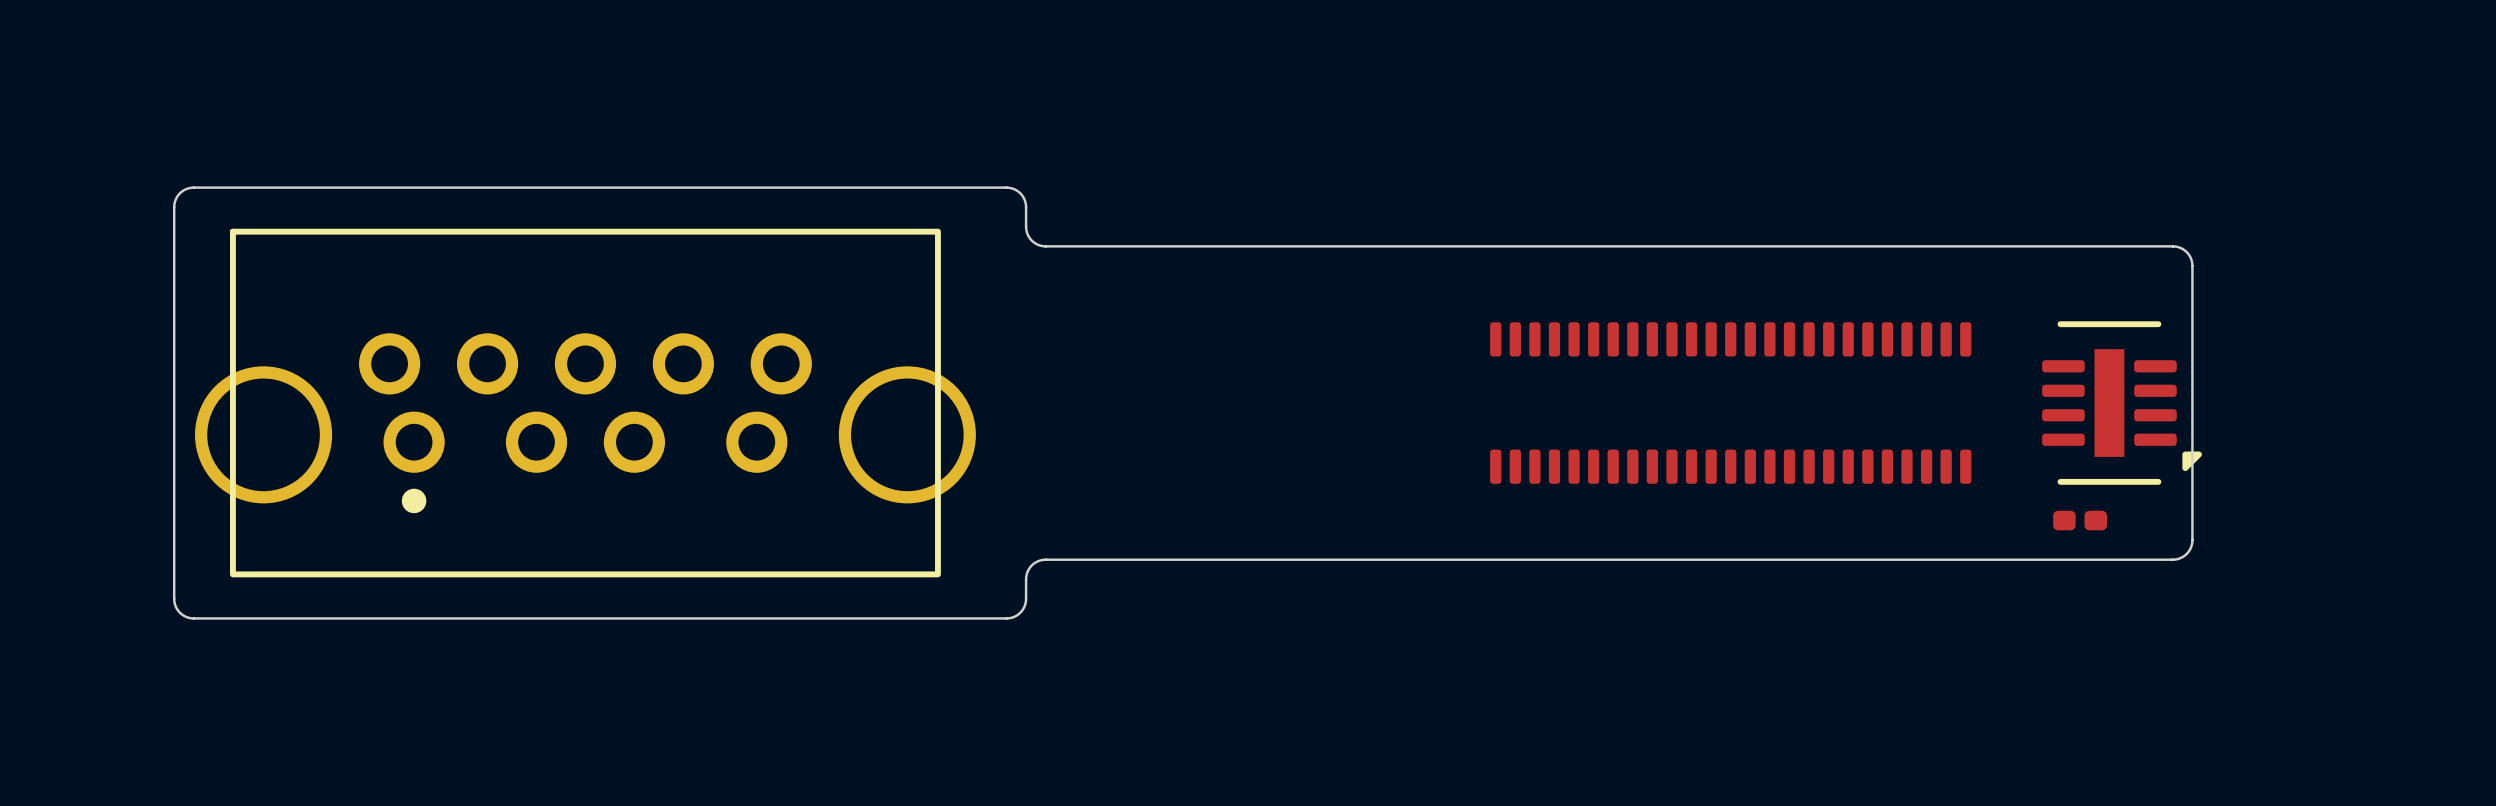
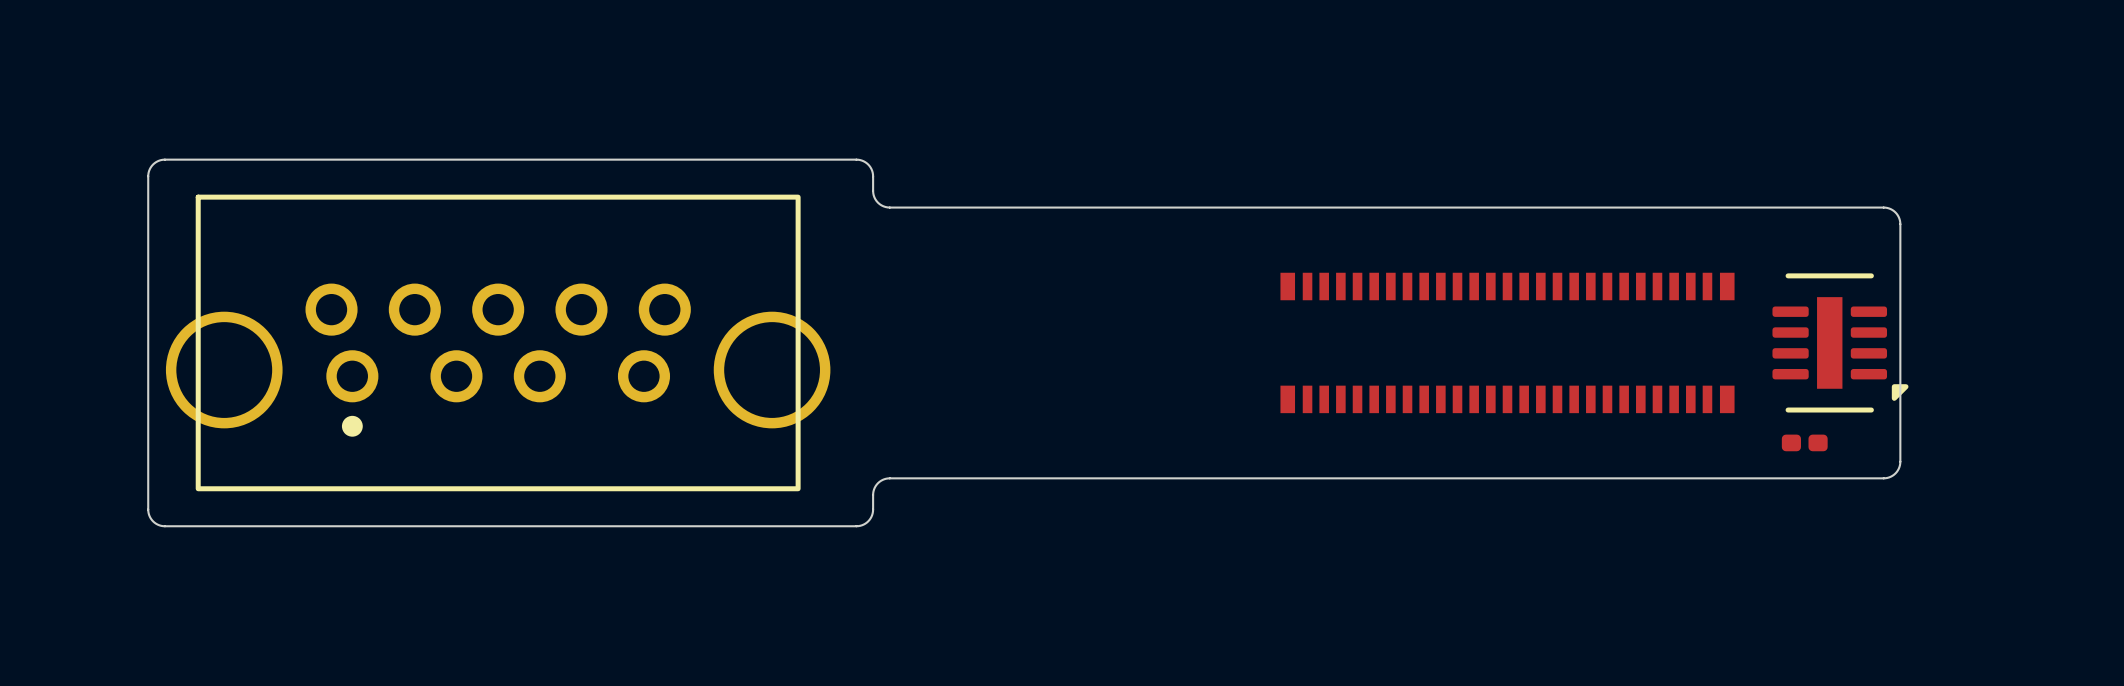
board edge: (1026, 224) (1027, 234) (1031, 240) (1045, 246) (2172, 246) (2186, 252) (2192, 265) (2192, 540) (2188, 552) (2177, 559) (1045, 559) (1037, 561) (1030, 567) (1026, 581) -> (873, 190) (877, 202) (889, 207) (1883, 207) (1895, 212) (1900, 224) (1900, 461) (1896, 472) (1887, 477) (889, 478) (877, 483) (873, 495)
part footprint: [1490, 322, 1972, 484] -> [1280, 272, 1735, 414]
part position: (2122, 403) -> (1840, 342)
part position: (2080, 520) -> (1804, 442)

